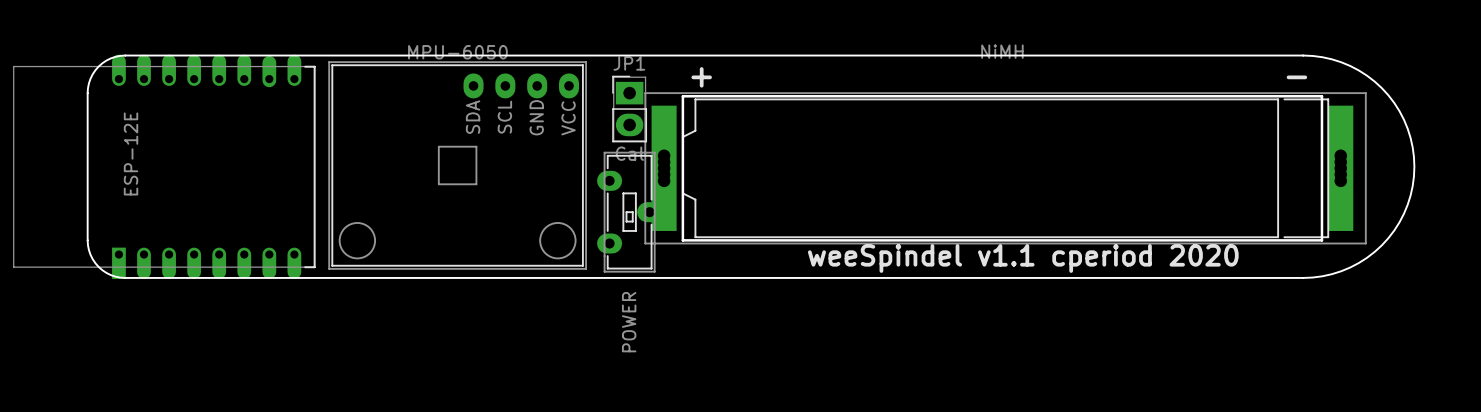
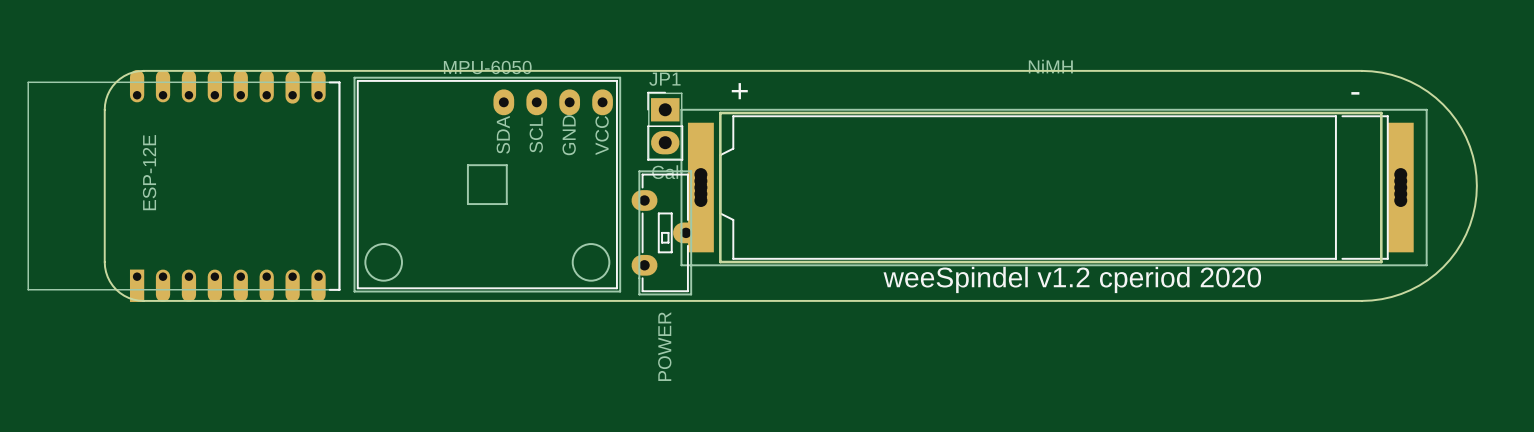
text: weeSpindel v1.1 cperiod 2020 (1023, 258) -> weeSpindel v1.2 cperiod 2020 (1072, 279)

